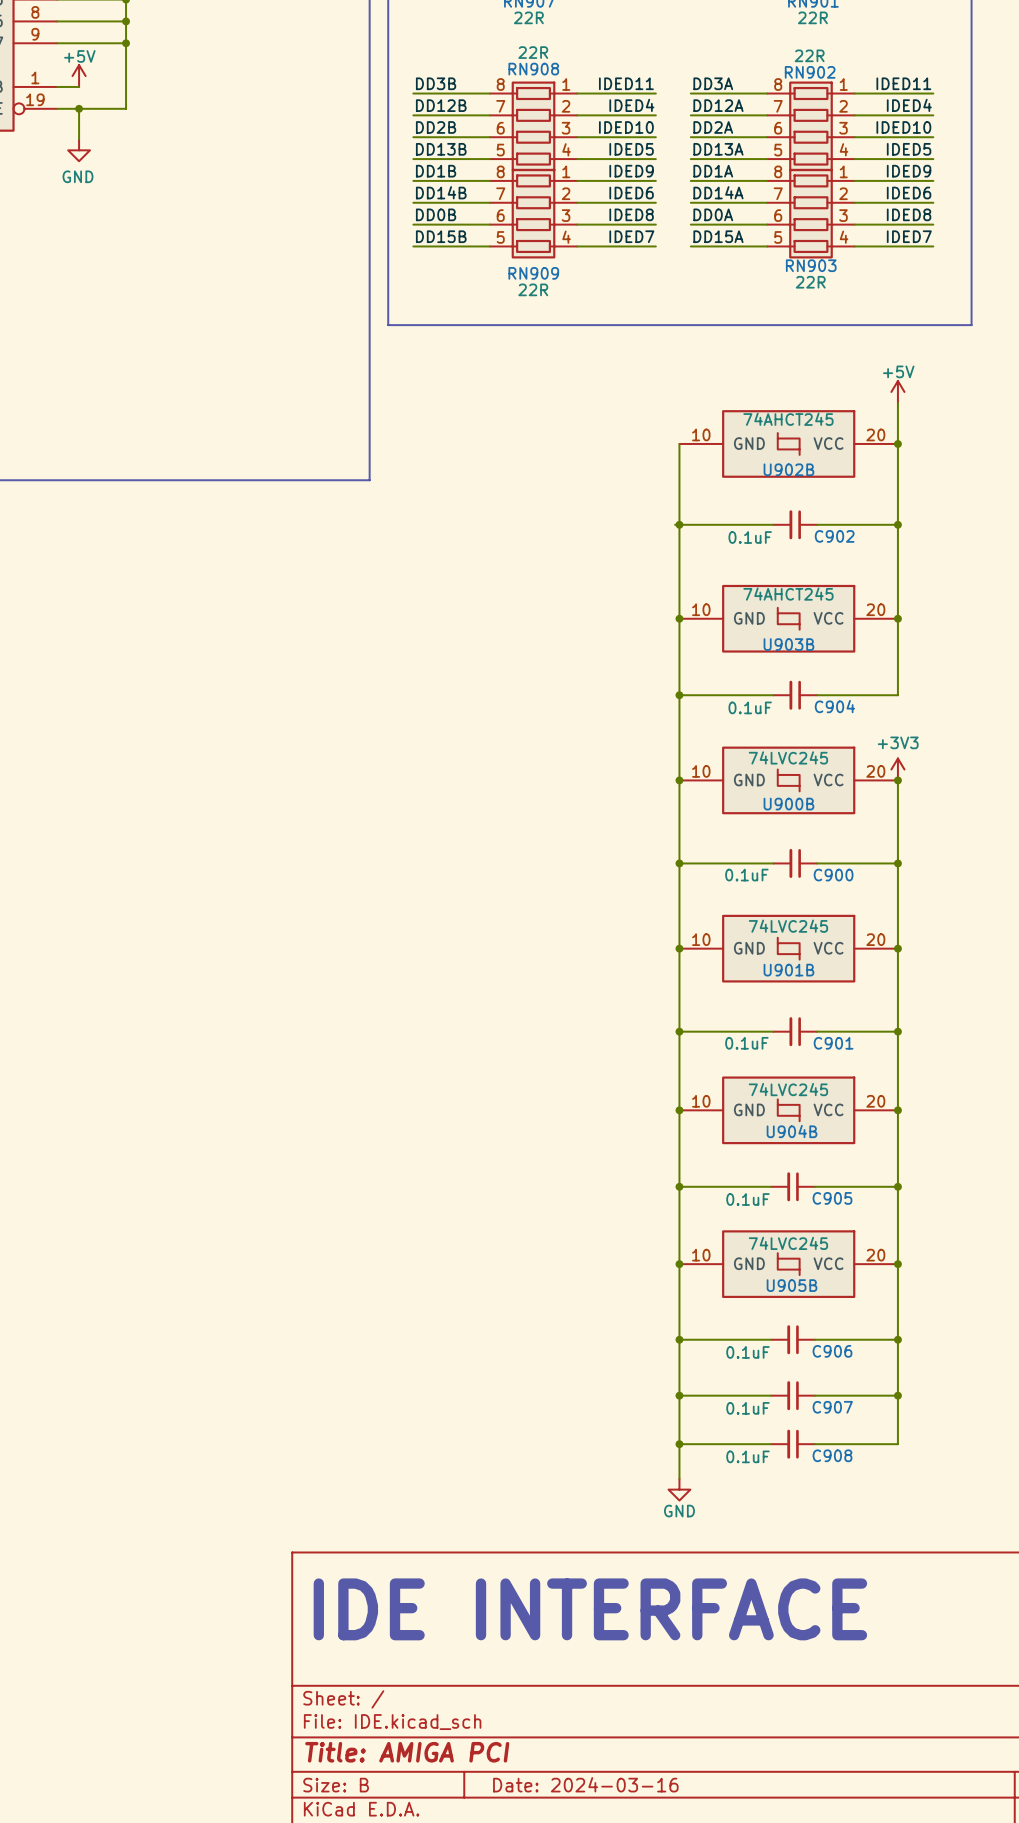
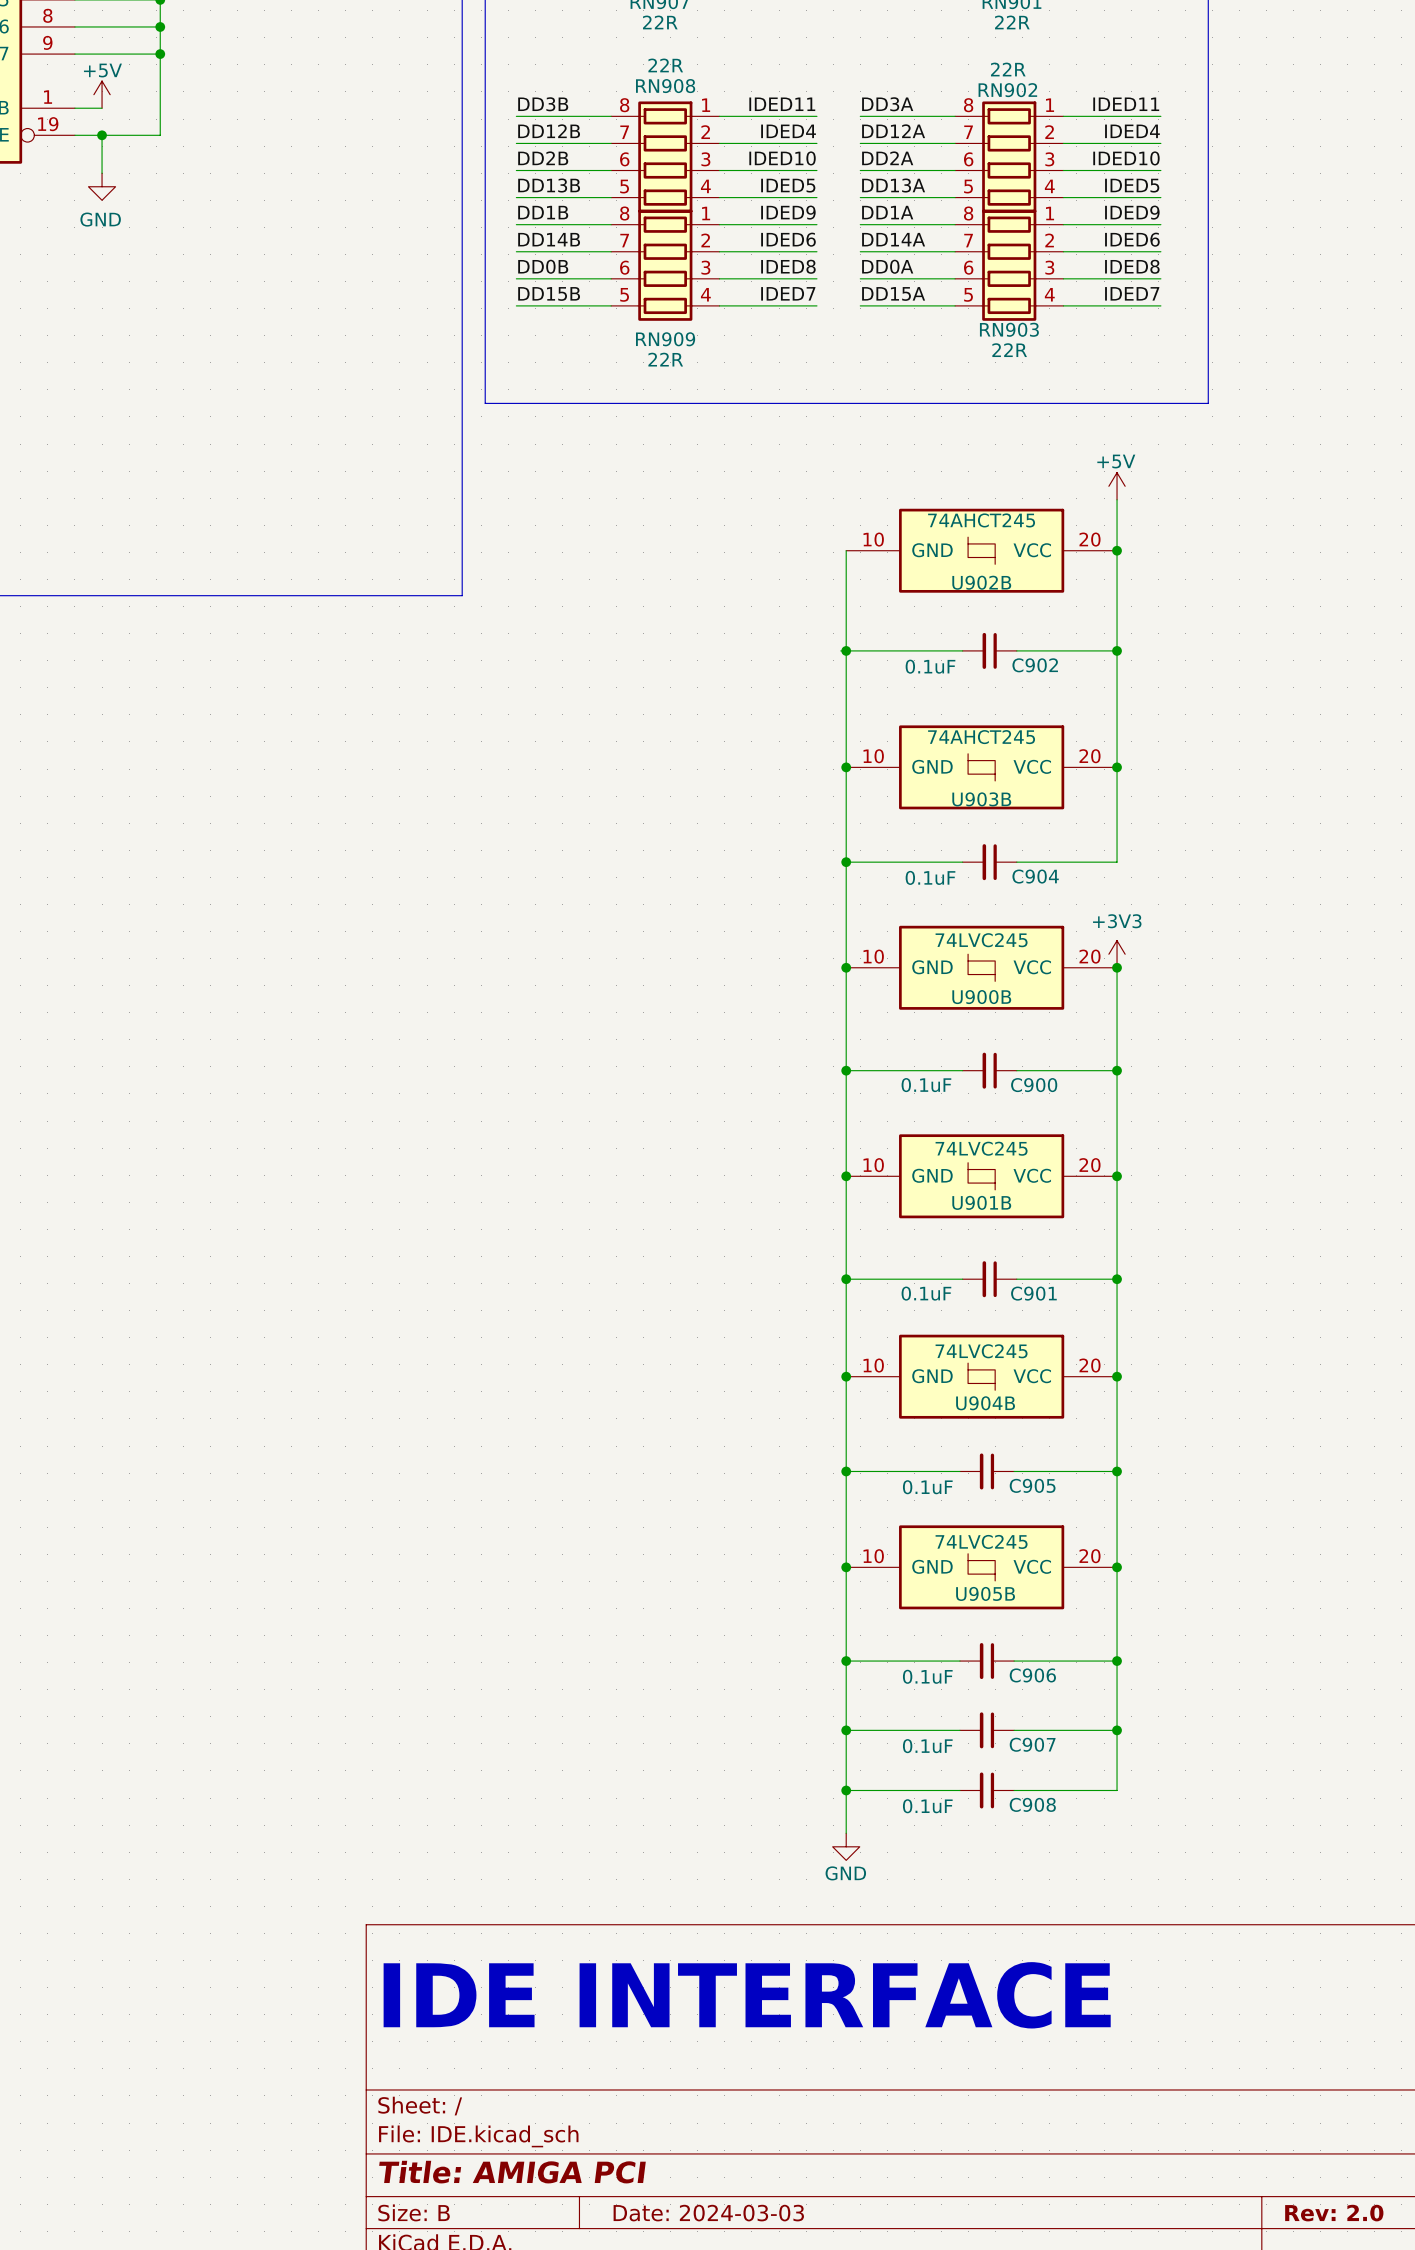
title block: Date: 2024-03-16 (585, 1784) -> Date: 2024-03-03 (708, 2213)

